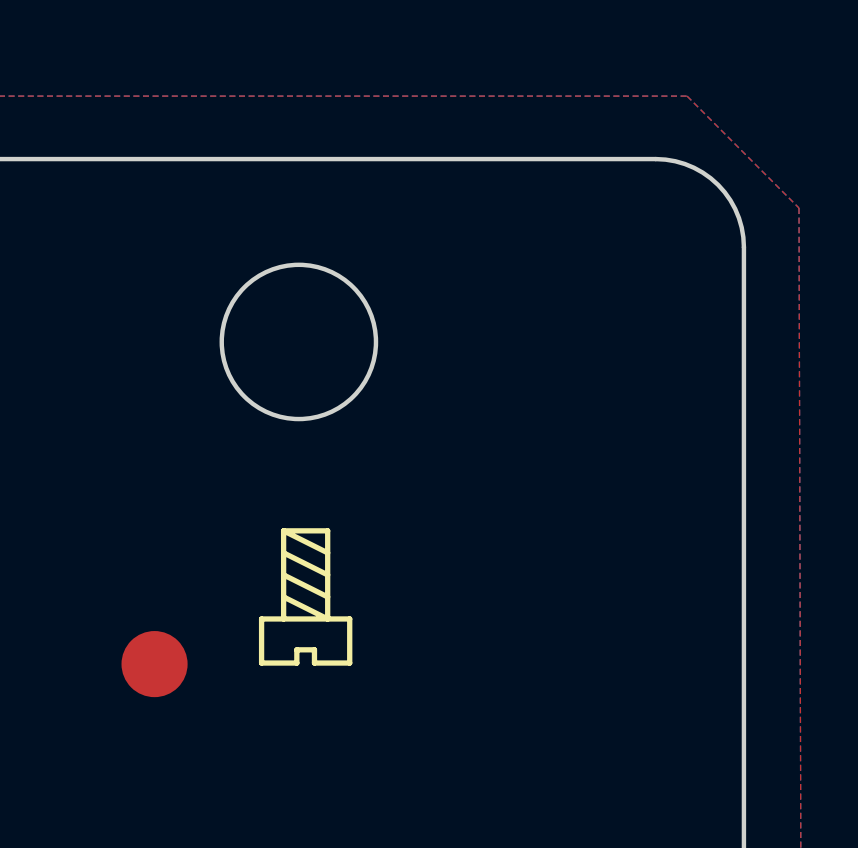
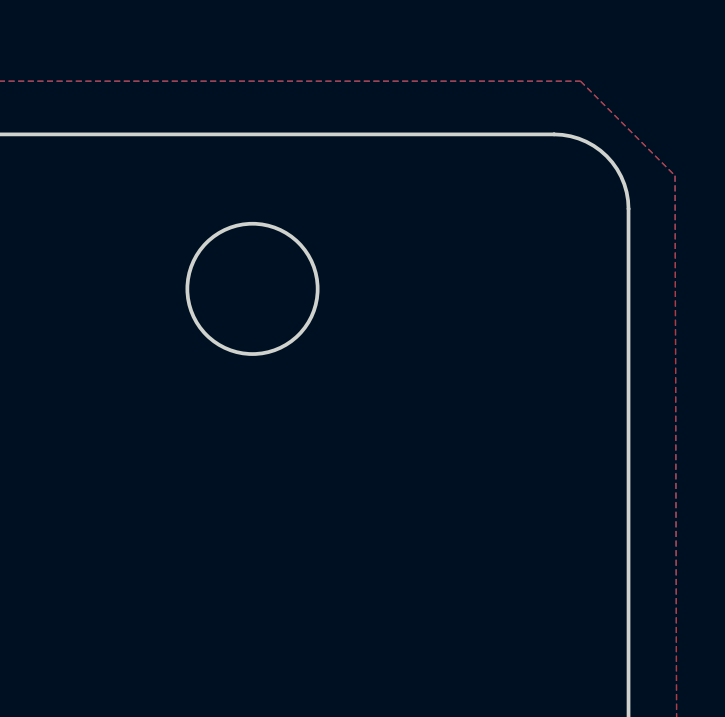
drawing: [258, 528, 353, 666] -> none
part: (154, 664) -> none

